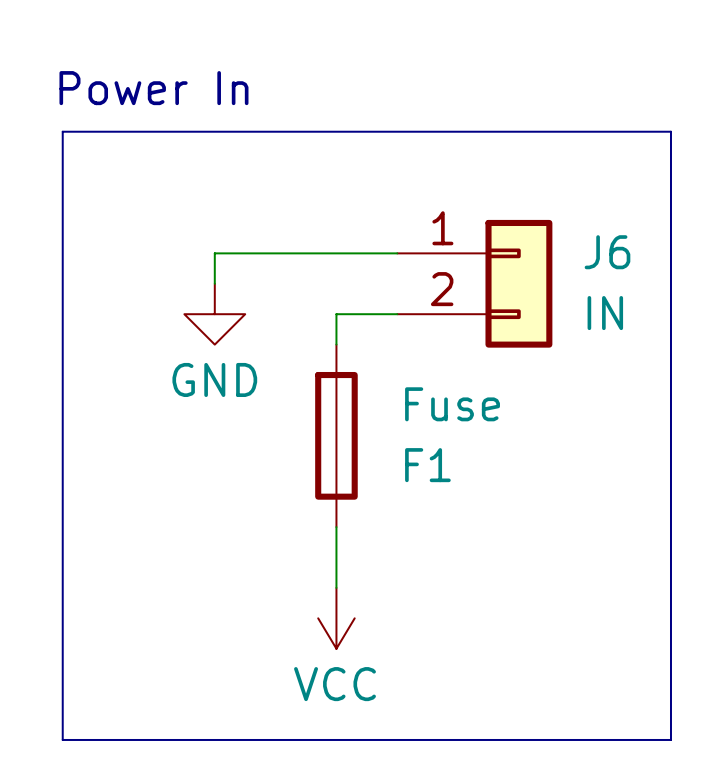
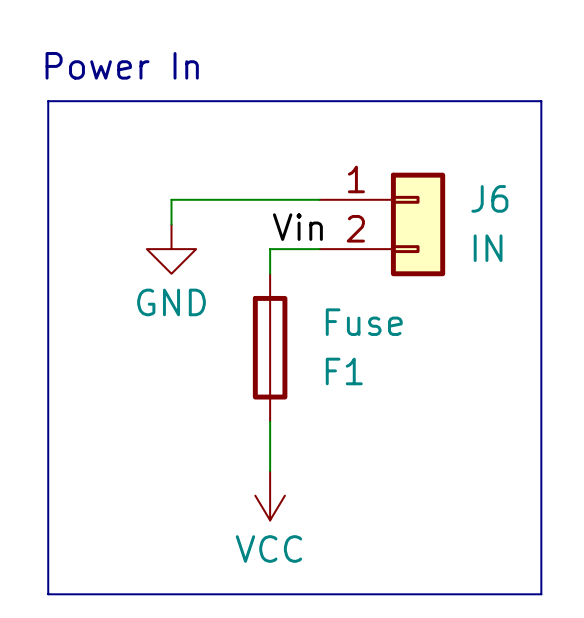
label: none -> Vin (297, 227)

